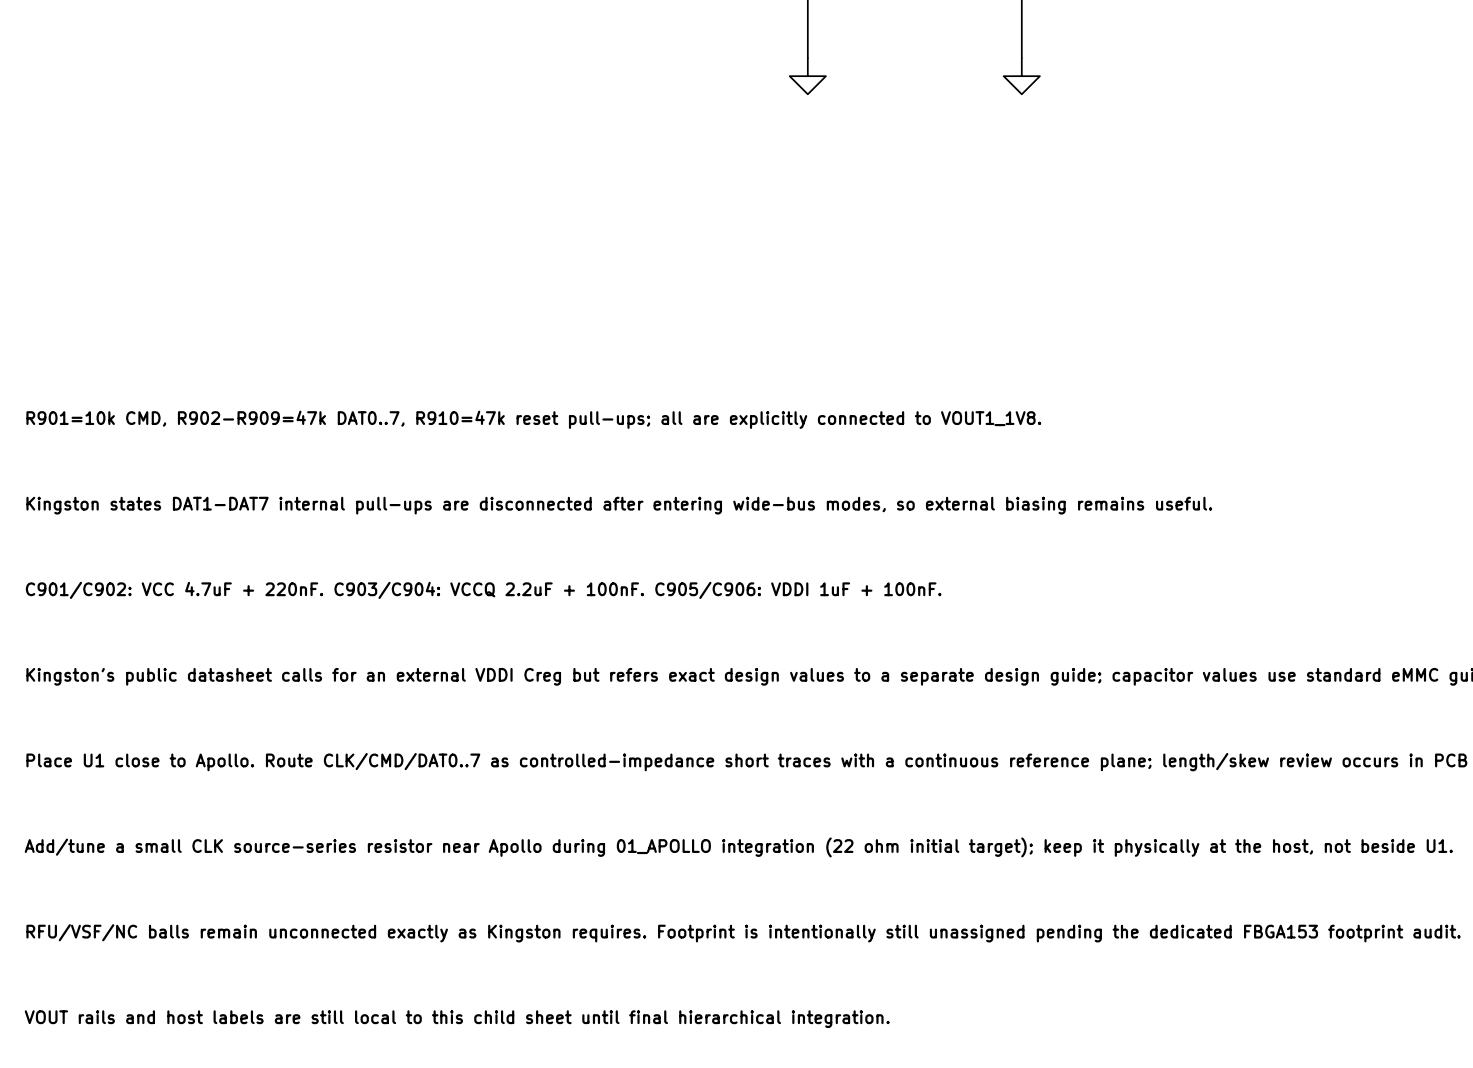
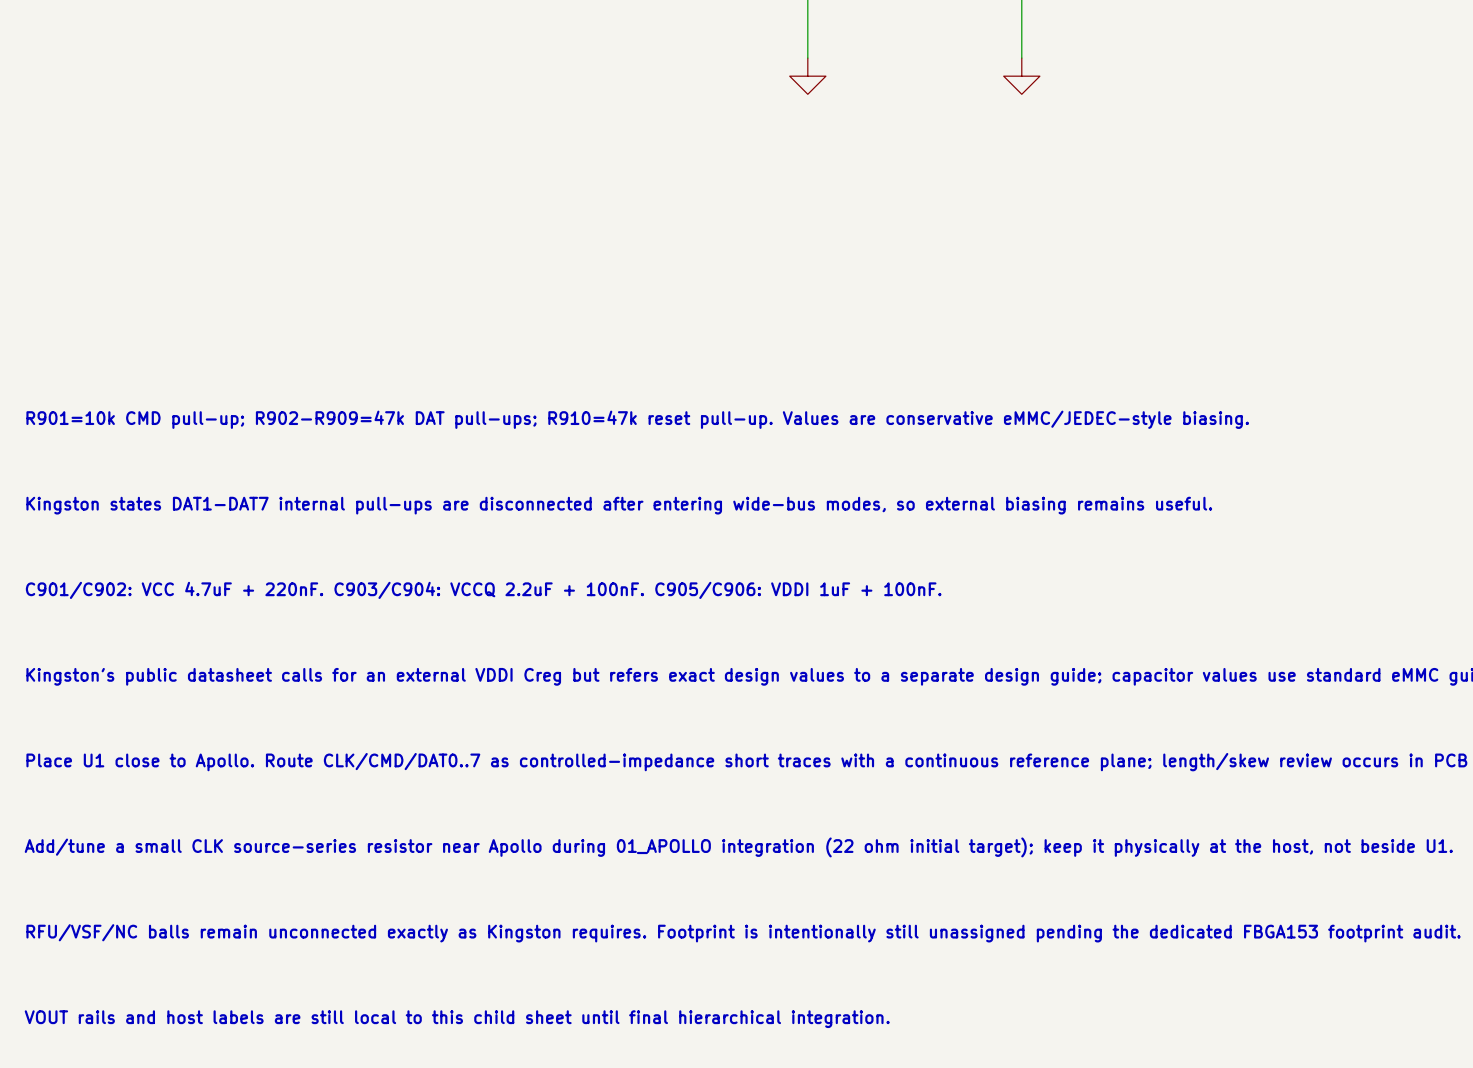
text: R901=10k CMD, R902-R909=47k DAT0..7, R910=47k reset pull-ups; all are explicitly connected to VOUT1_1V8. (533, 419) -> R901=10k CMD pull-up; R902-R909=47k DAT pull-ups; R910=47k reset pull-up. Values are conservative eMMC/JEDEC-style biasing. (637, 419)

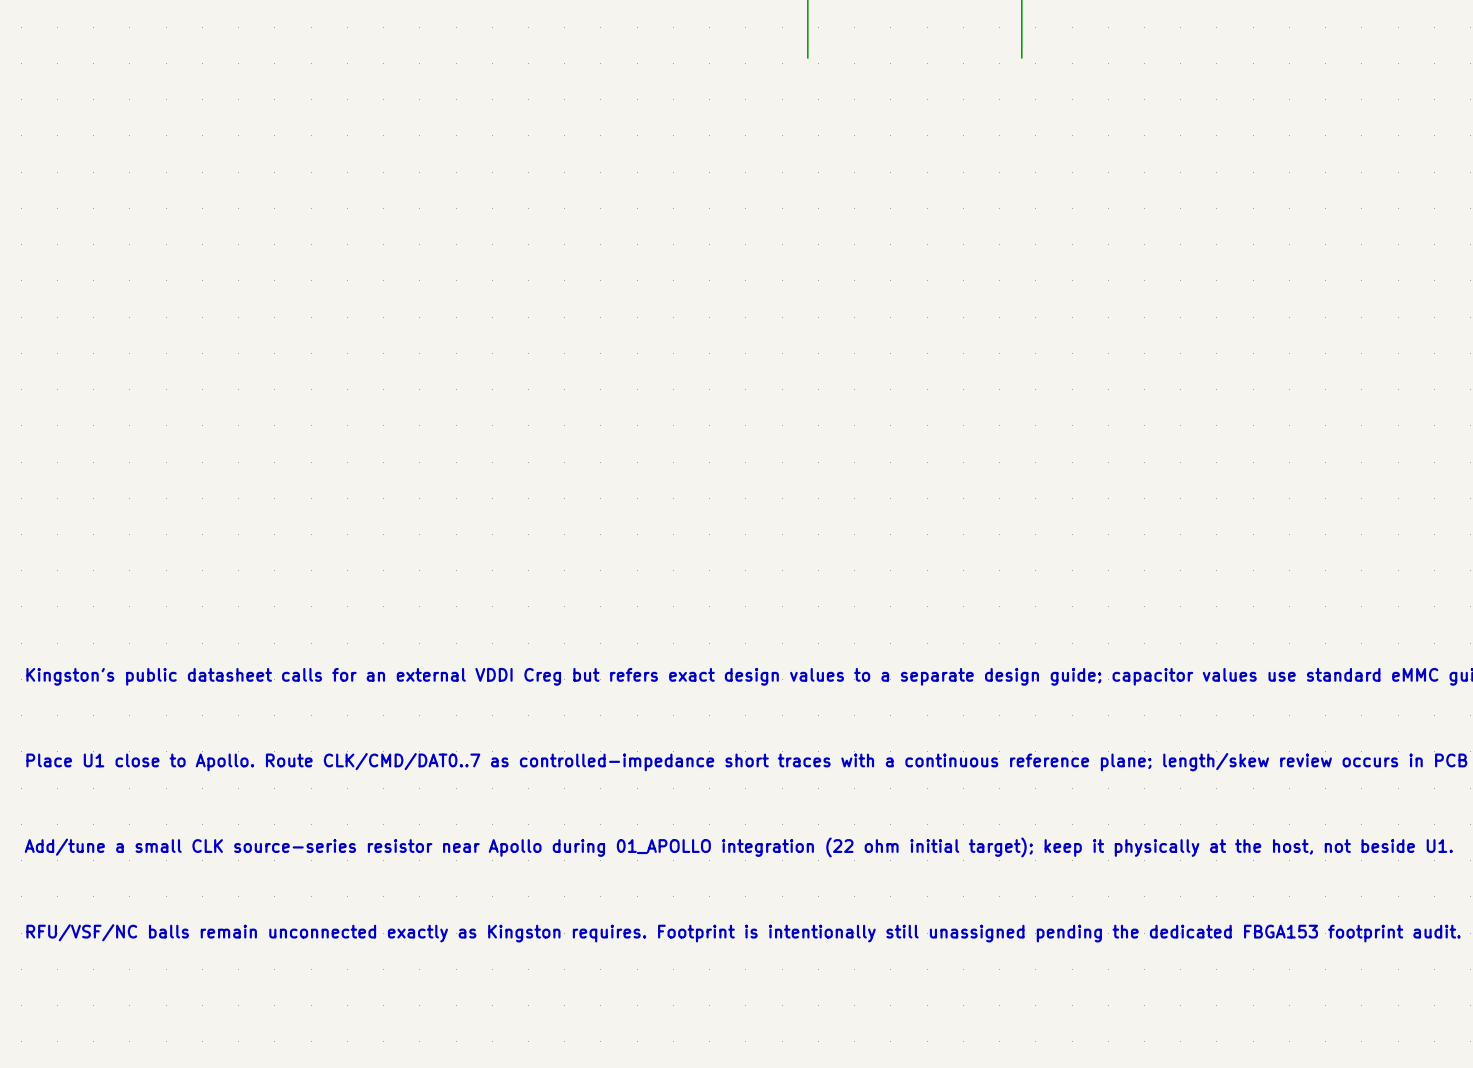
power symbol: (807, 76) -> none
power symbol: (1021, 76) -> none
text: R901=10k CMD pull-up; R902-R909=47k DAT pull-ups; R910=47k reset pull-up. Values are conservative eMMC/JEDEC-style biasing. (637, 419) -> none
text: Kingston states DAT1-DAT7 internal pull-ups are disconnected after entering wide-bus modes, so external biasing remains useful. (619, 505) -> none
text: C901/C902: VCC 4.7uF + 220nF. C903/C904: VCCQ 2.2uF + 100nF. C905/C906: VDDI 1uF + 100nF. (483, 590) -> none
text: VOUT rails and host labels are still local to this child sheet until final hierarchical integration. (457, 1019) -> none

